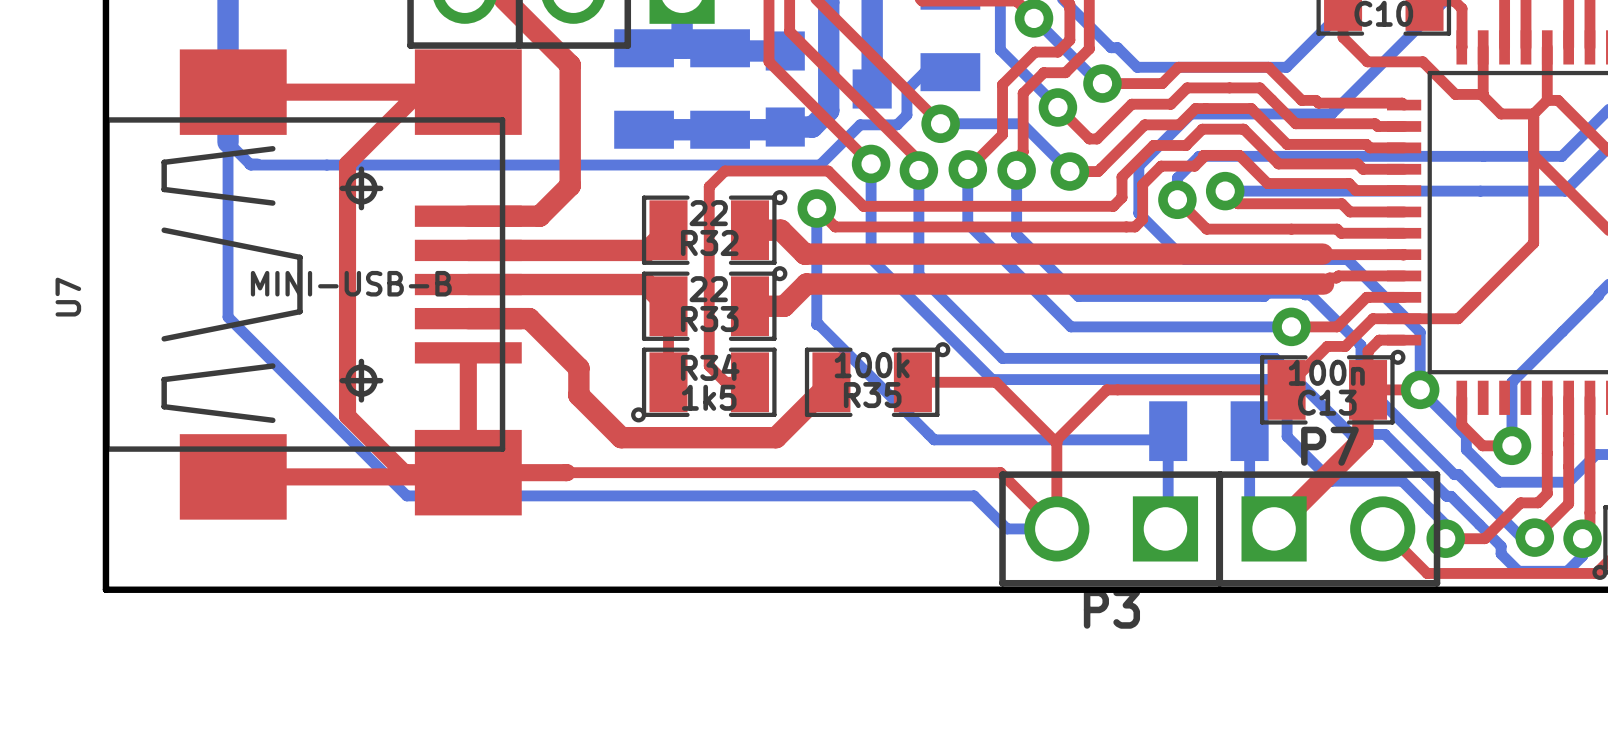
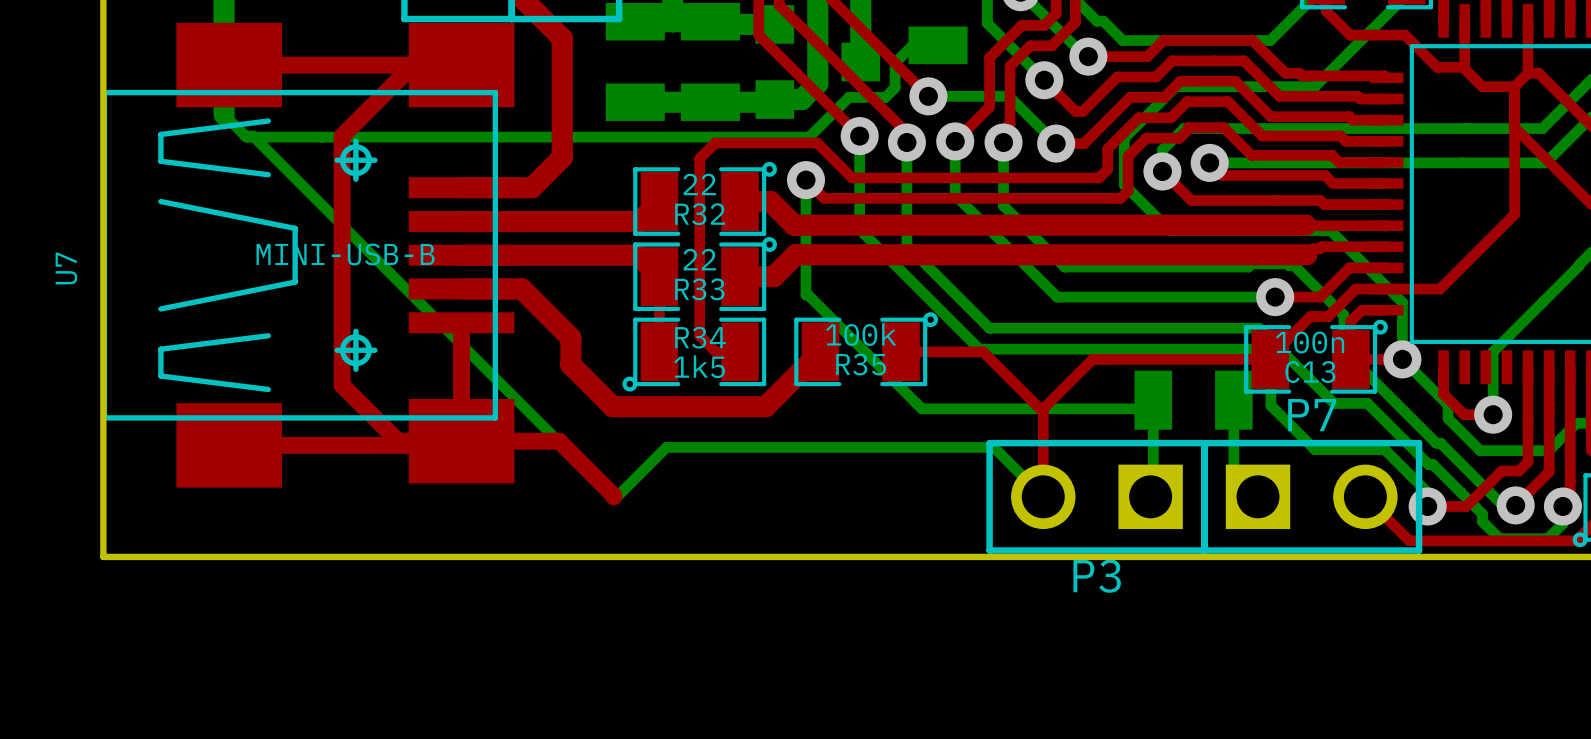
bottom track: (228, 142) (228, 317) (406, 495) (974, 495) (1007, 528) (1056, 528) -> (253, 136) (613, 496) (617, 496) (666, 447) (993, 447) (1043, 496)
top track: (1368, 389) (1362, 394) (1362, 440) (1274, 528) -> none
top track: (566, 472) (1000, 472) (1056, 528) -> (559, 441) (613, 496)

